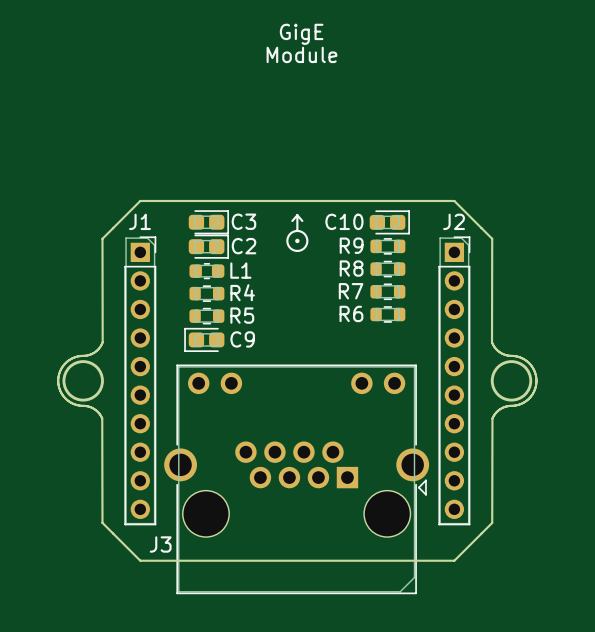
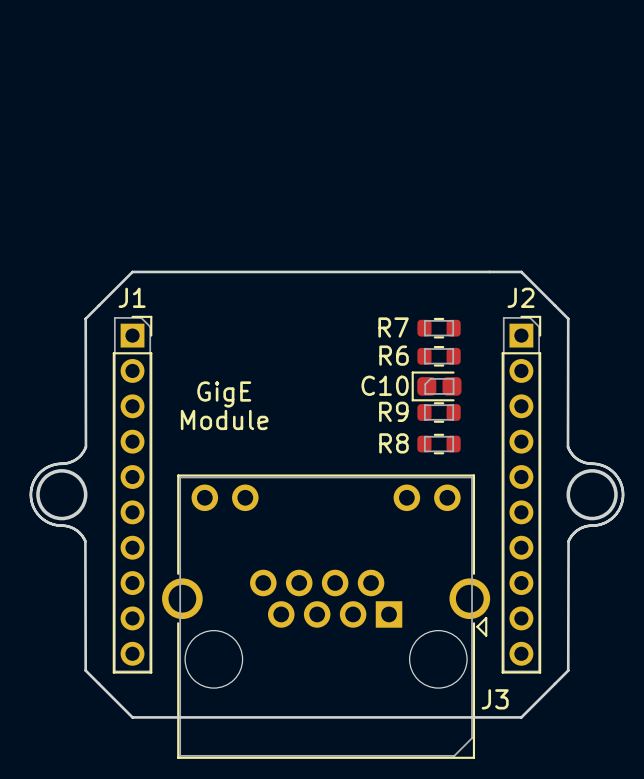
text position: GigE (301, 34) -> GigE (224, 394)
text position: Module (301, 54) -> Module (224, 419)
drawing: [286, 214, 309, 253] -> none
C3: (208, 222) -> none
C10 rotation: 0° (389, 222) -> 180° (436, 386)
C10 position: (389, 222) -> (436, 386)
R9 name: R9 (351, 245) -> R7 (393, 327)
C2: (208, 246) -> none
R8 name: R8 (351, 268) -> R6 (394, 355)
L1: (206, 271) -> none
R7: (387, 291) -> none
R4: (206, 293) -> none
R6 name: R6 (351, 313) -> R9 (393, 411)
R5: (206, 316) -> none
C9: (204, 339) -> none
R8: none -> (439, 444)
J3 name position: J3 (160, 544) -> J3 (495, 699)

